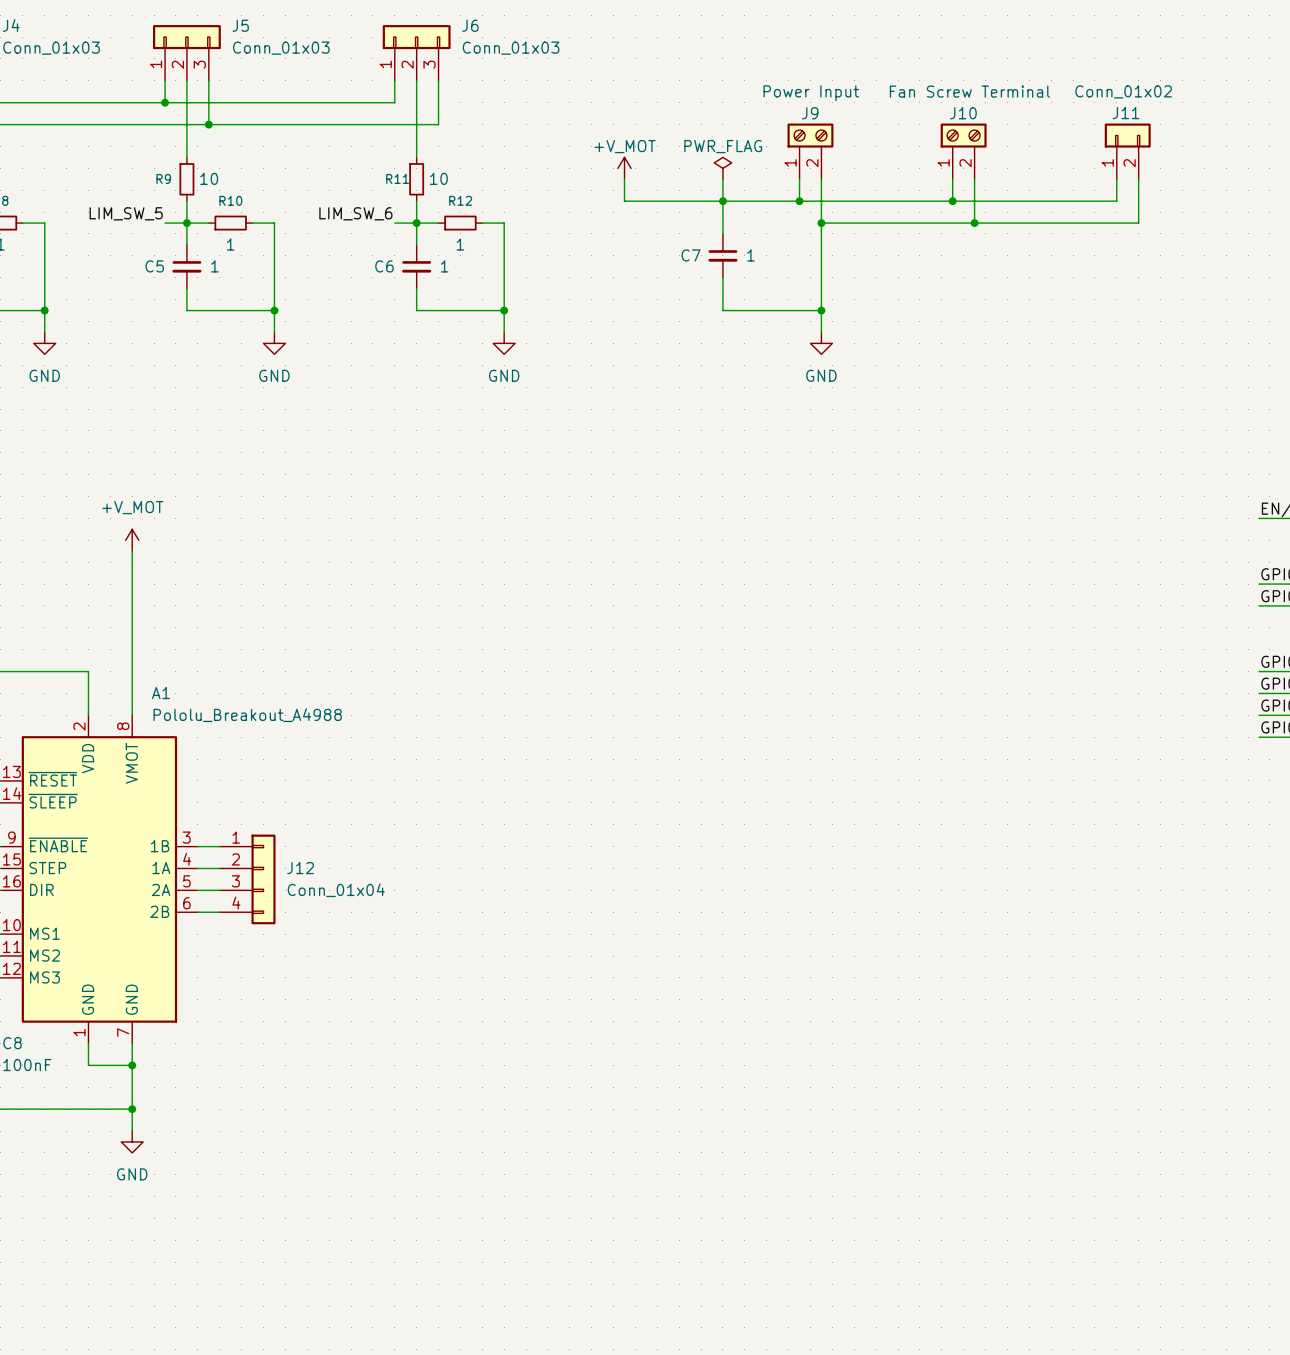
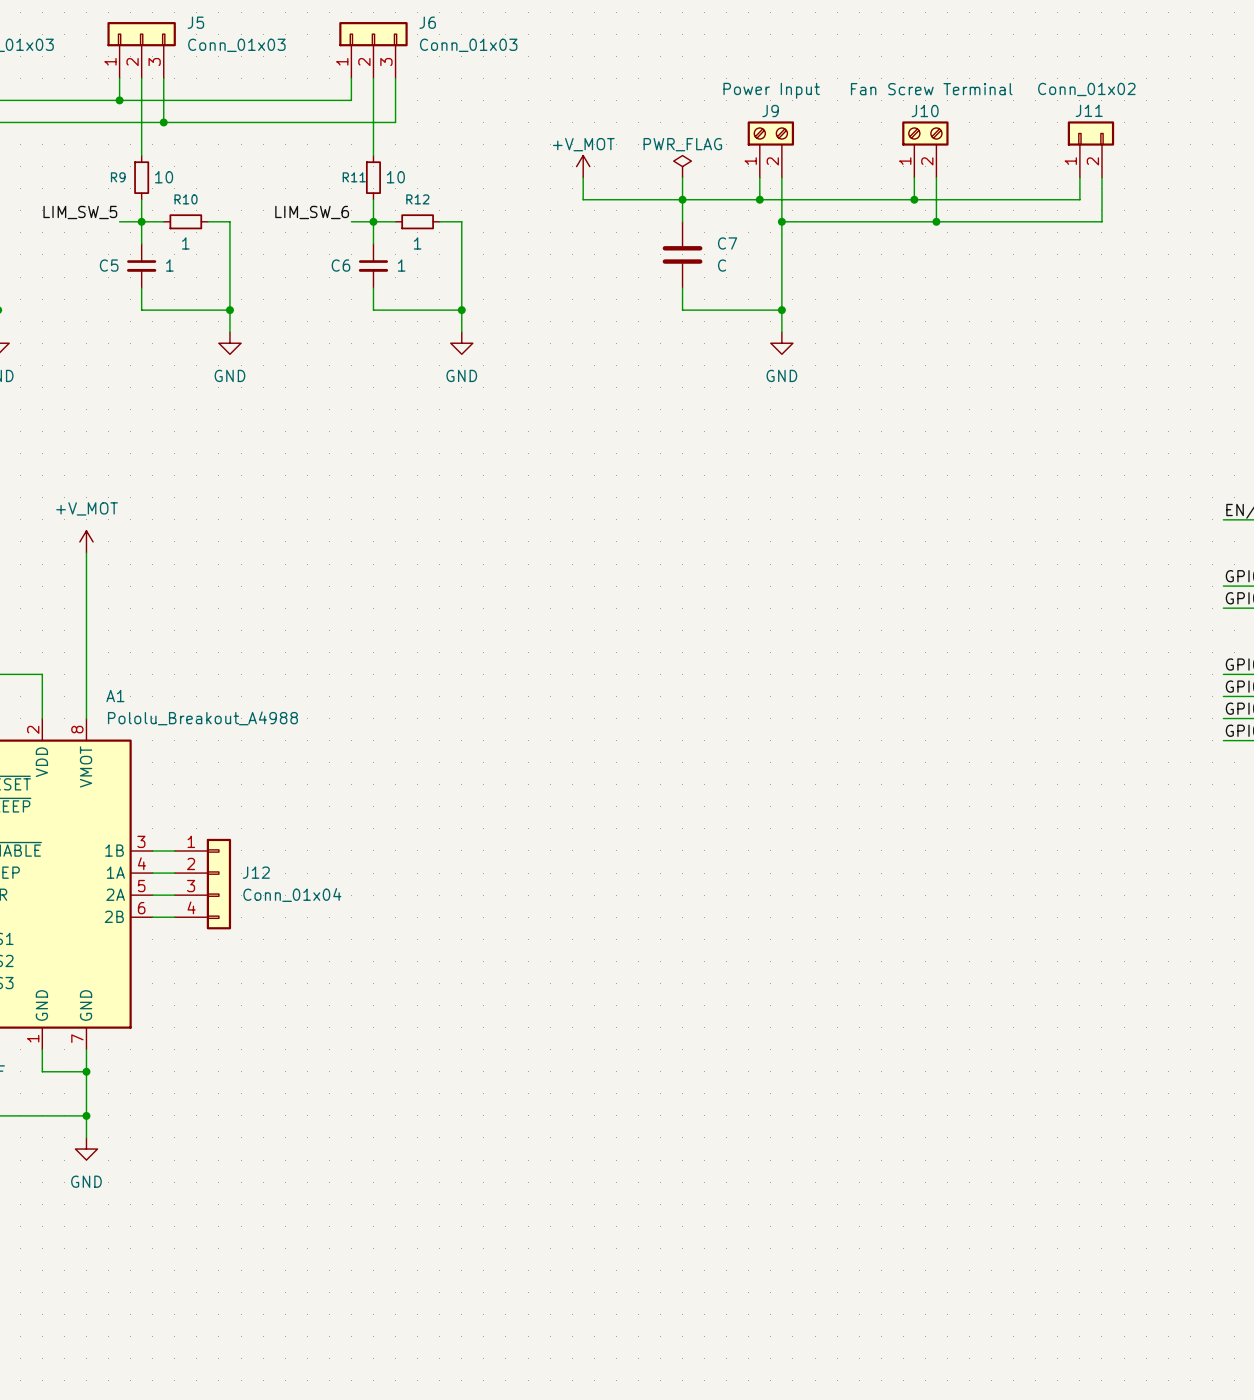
C7 symbol: [708, 233, 738, 278] -> [662, 221, 703, 289]
C7 name position: C7 (691, 255) -> C7 (727, 243)
C7 value: 1 (750, 255) -> C (722, 265)

